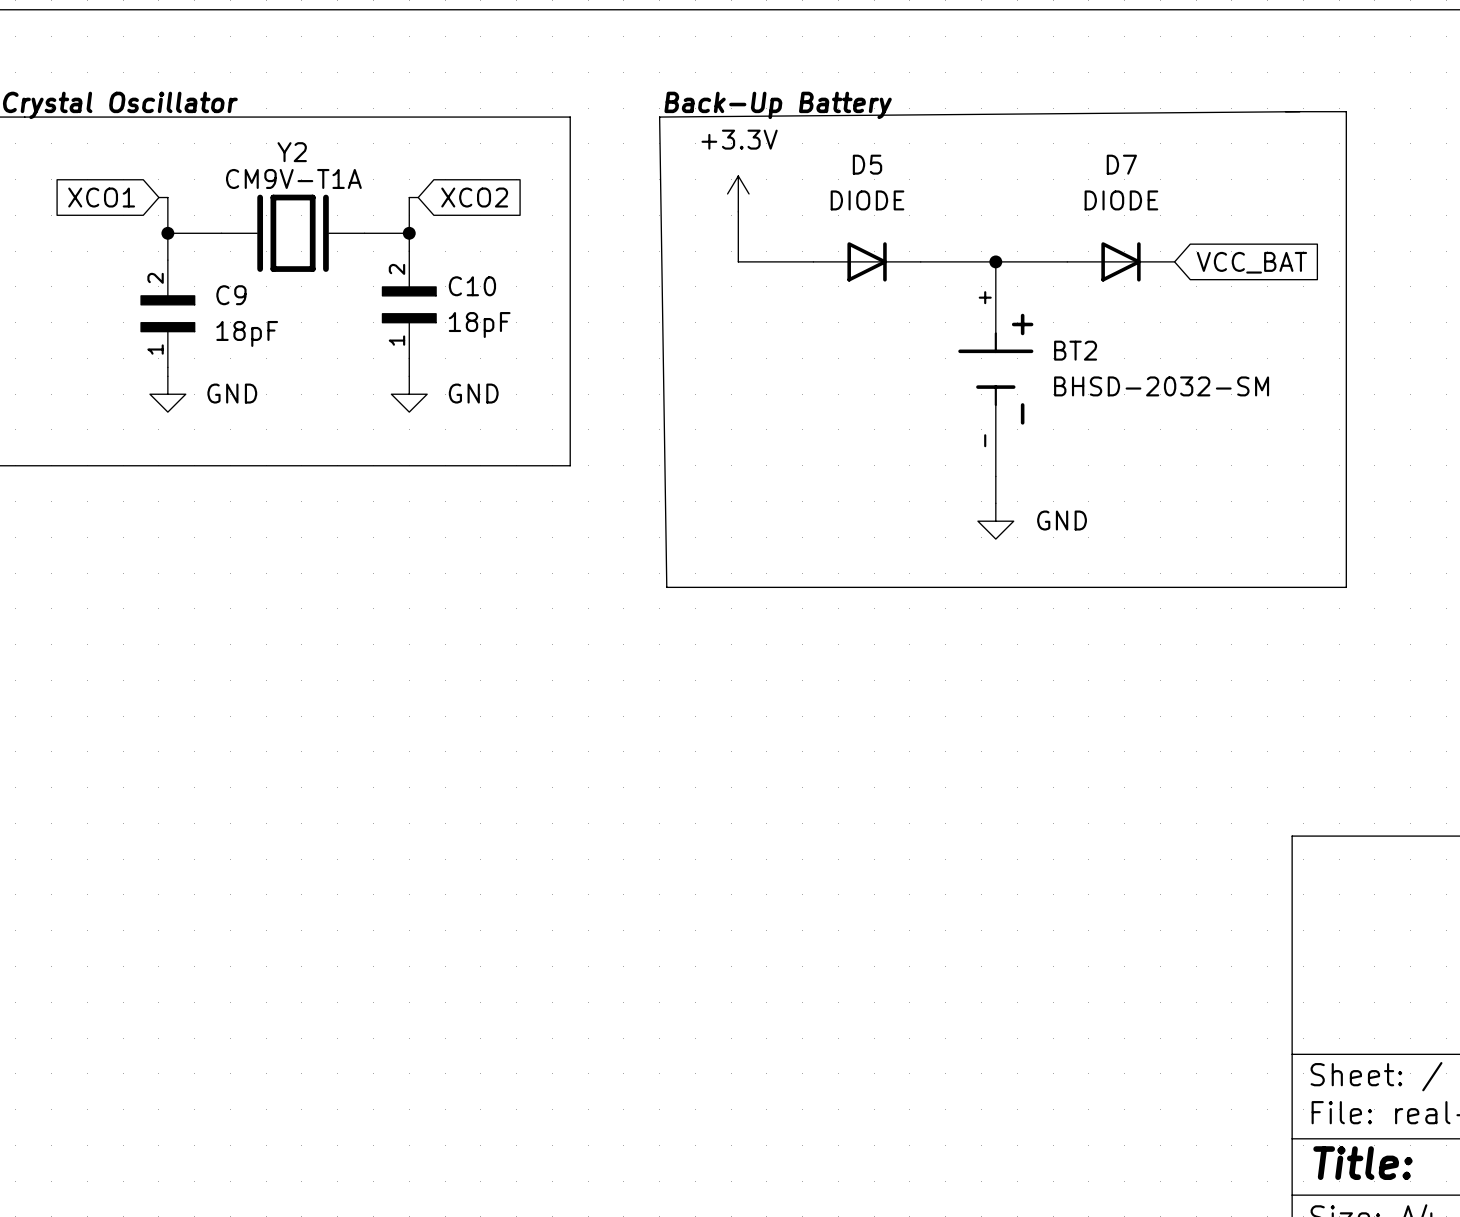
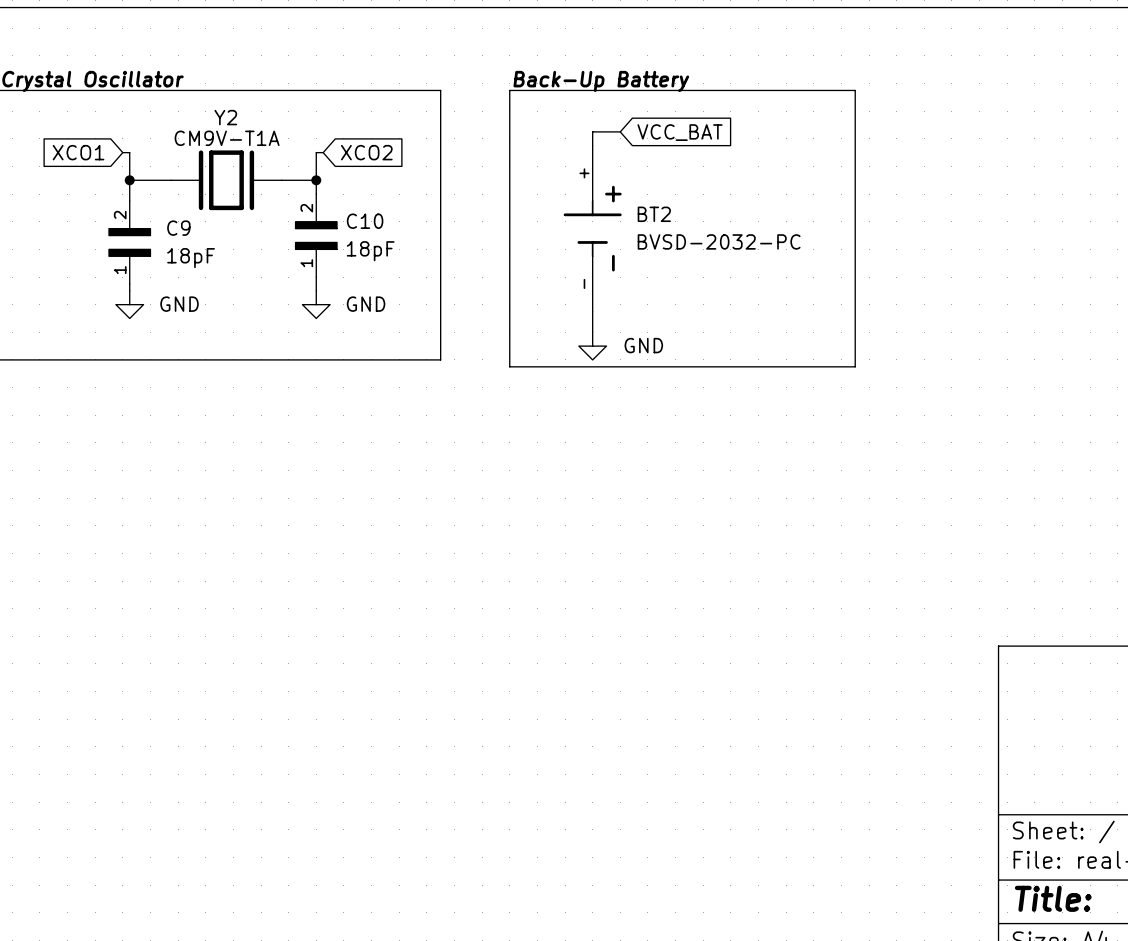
line: (1285, 111) (1346, 111) (1346, 587) (666, 587) (659, 117) (1299, 111) -> none
line: none -> (509, 90) (509, 366) (855, 366) (855, 90) (509, 90)
wire: none -> (620, 131) (592, 131) (592, 145)
global label: none -> VCC_BAT (680, 132)
power symbol: +3.3V (738, 193) -> none
wire: (738, 211) (738, 261) (813, 261) -> none
D5: DIODE (867, 261) -> none
wire: (920, 261) (1067, 261) -> none
junction: (995, 261) -> none
D7: DIODE (1121, 261) -> none
global label: VCC_BAT (1251, 262) -> none
BT2 position: (995, 369) -> (592, 228)
BT2 value: BHSD-2032-SM (1161, 386) -> BVSD-2032-PC (719, 241)
wire: (995, 476) (995, 503) -> (592, 311) (592, 332)
power symbol position: GND (995, 521) -> GND (592, 346)

